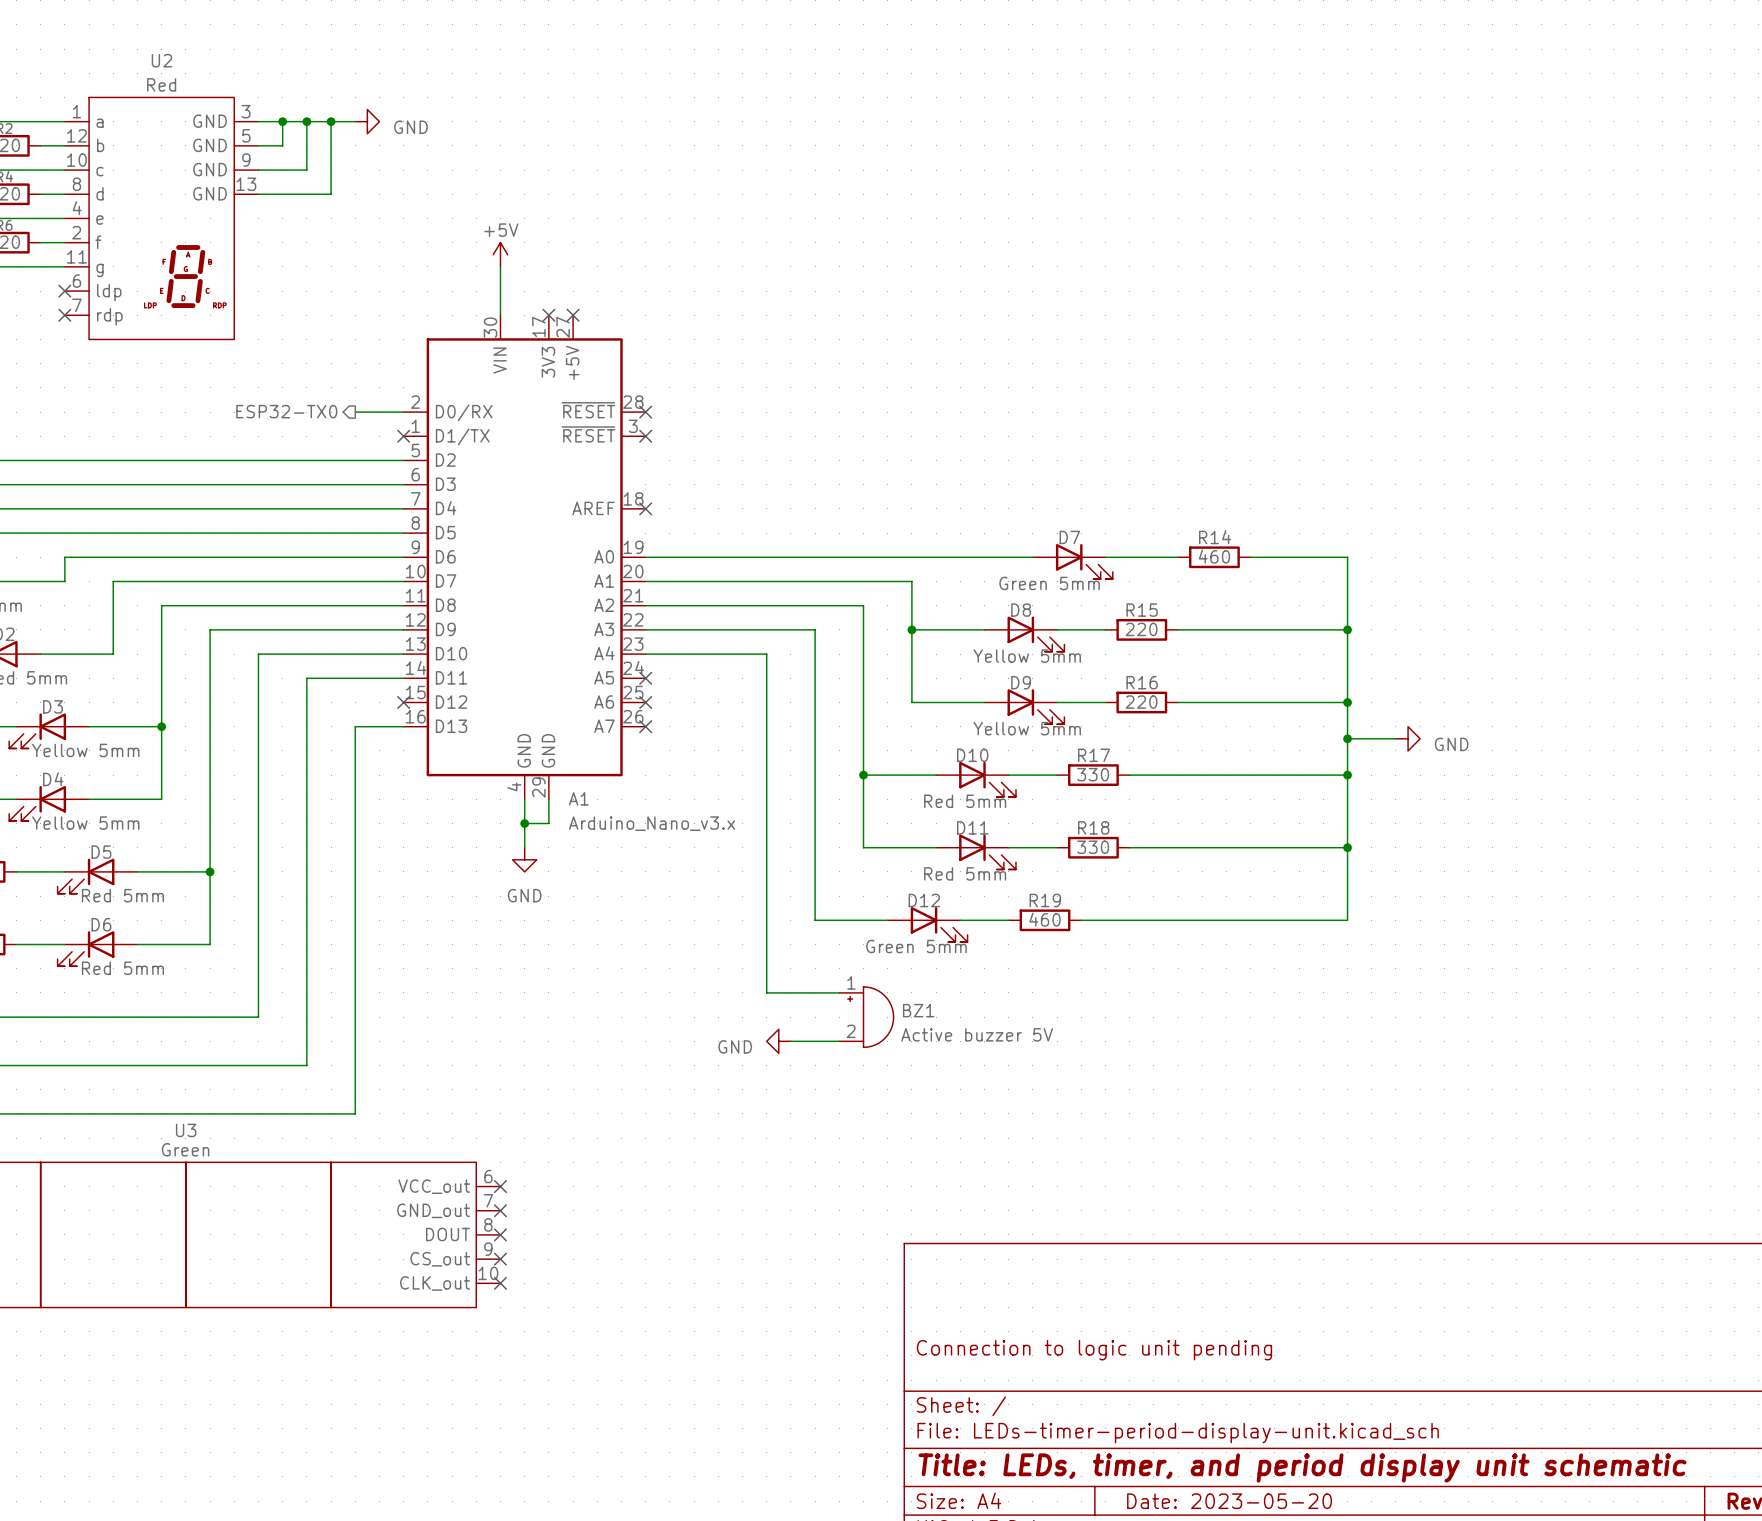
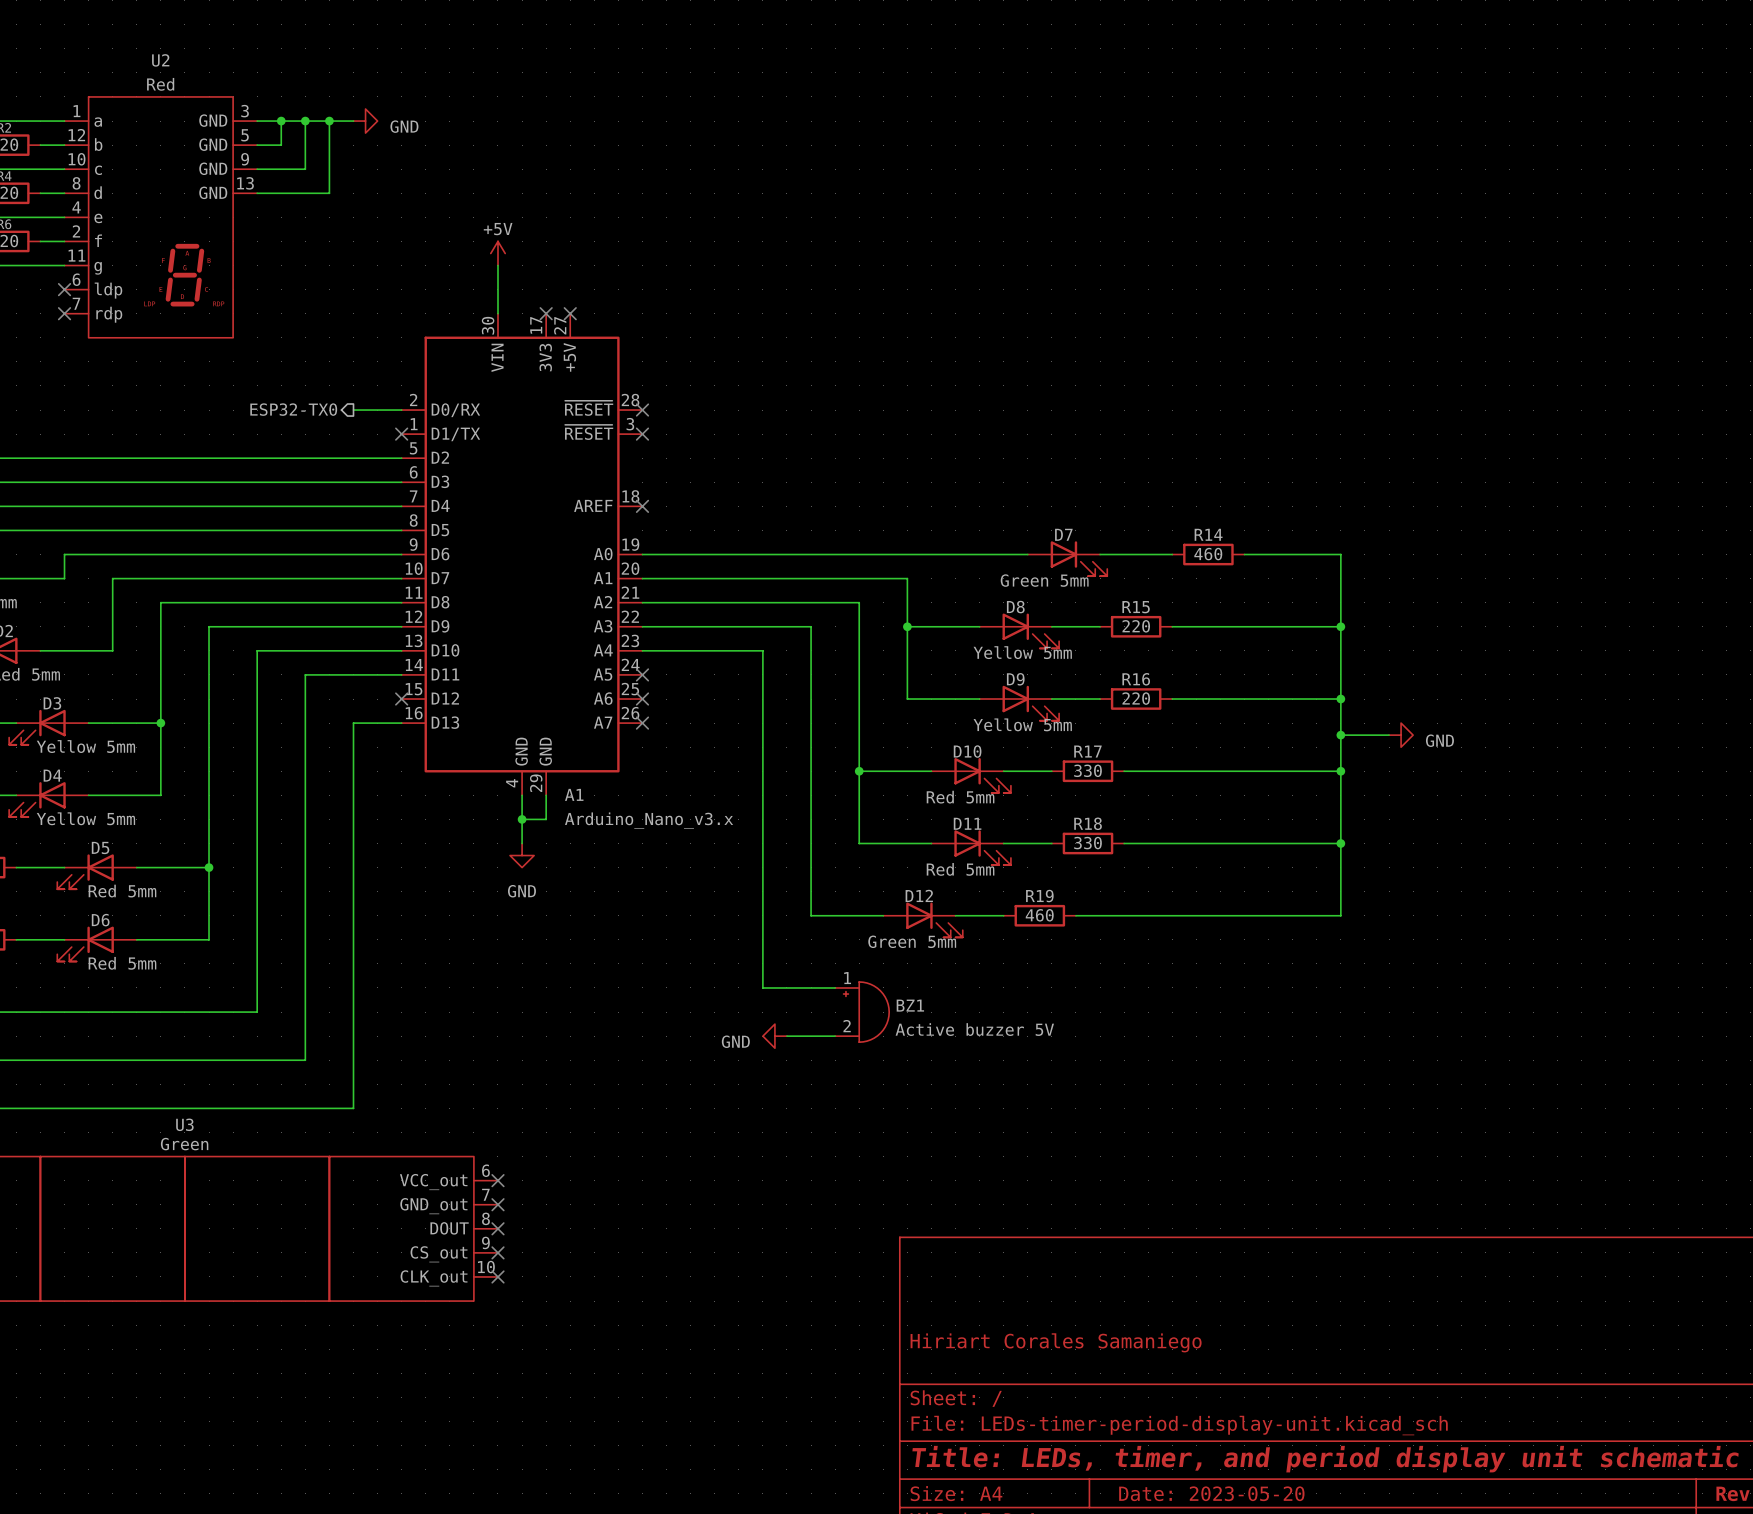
title block: Connection to logic unit pending (1094, 1350) -> Hiriart Corales Samaniego (1056, 1342)

